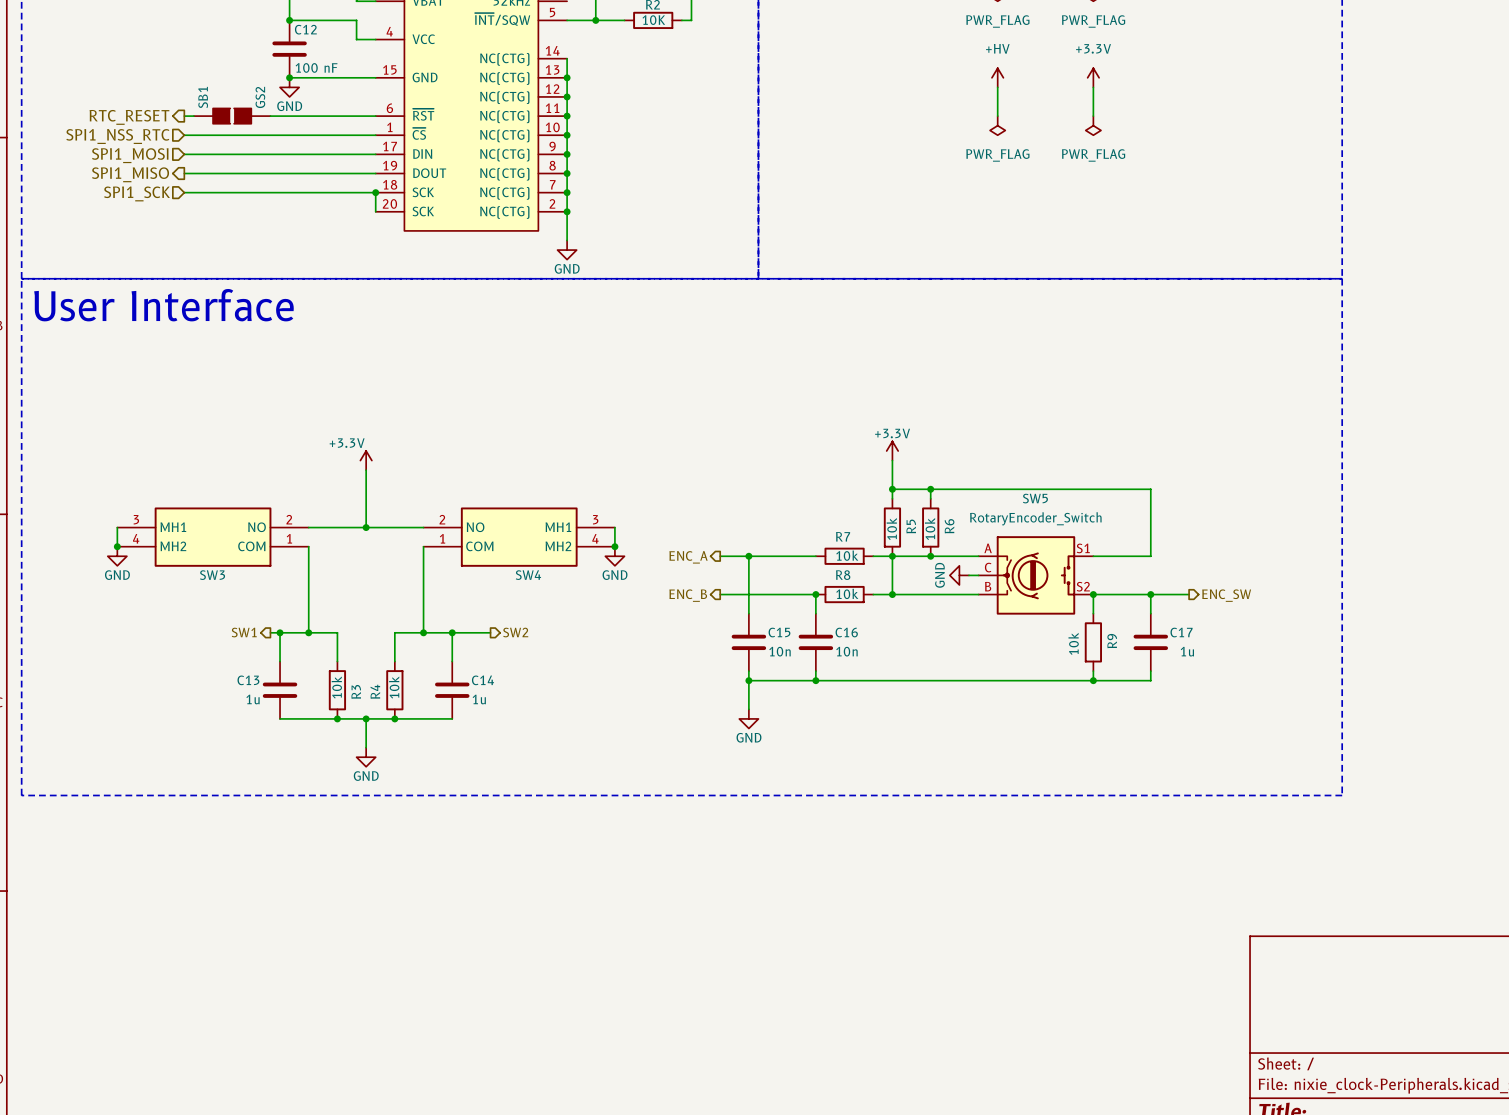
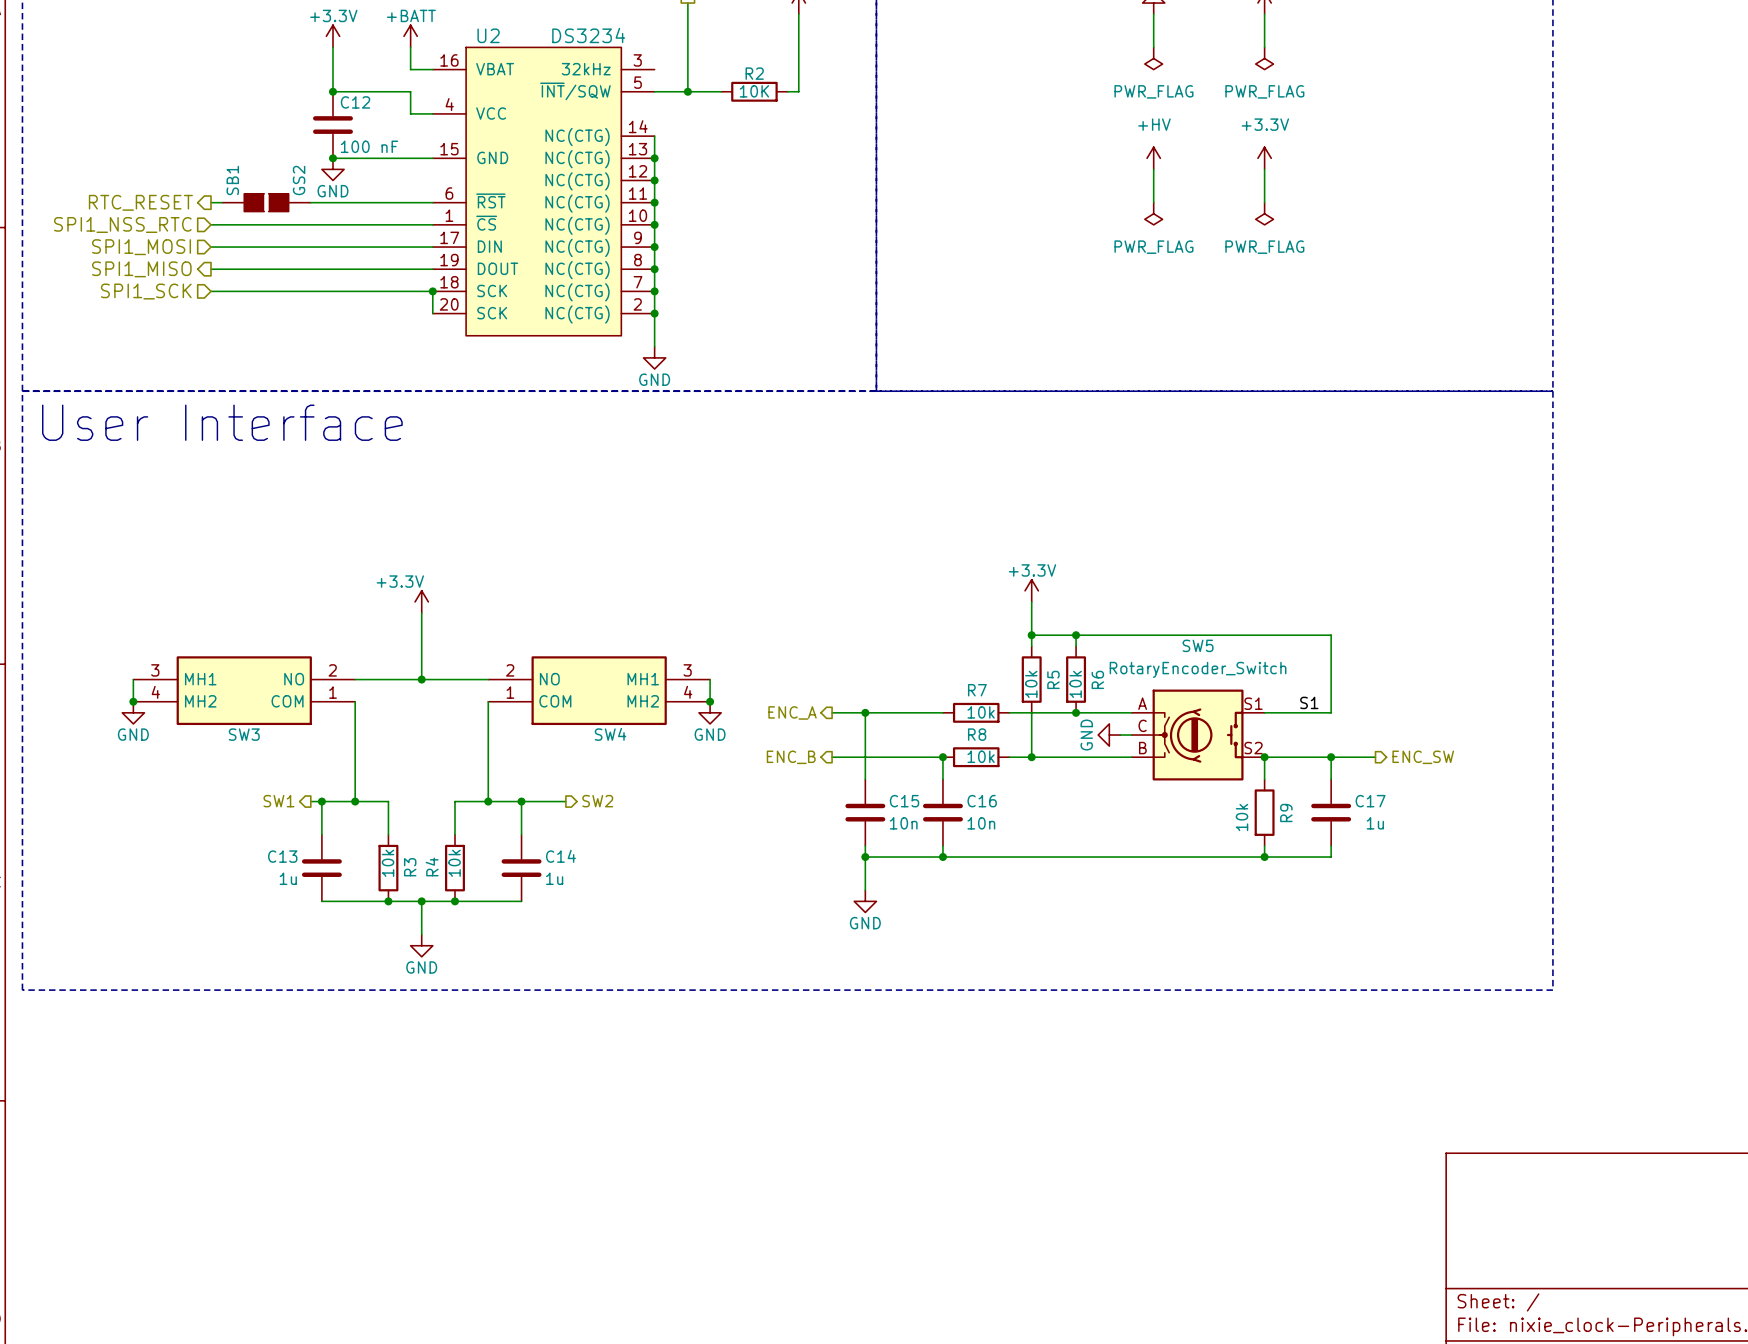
label: none -> S1 (1309, 702)
junction: (892, 556) -> none

